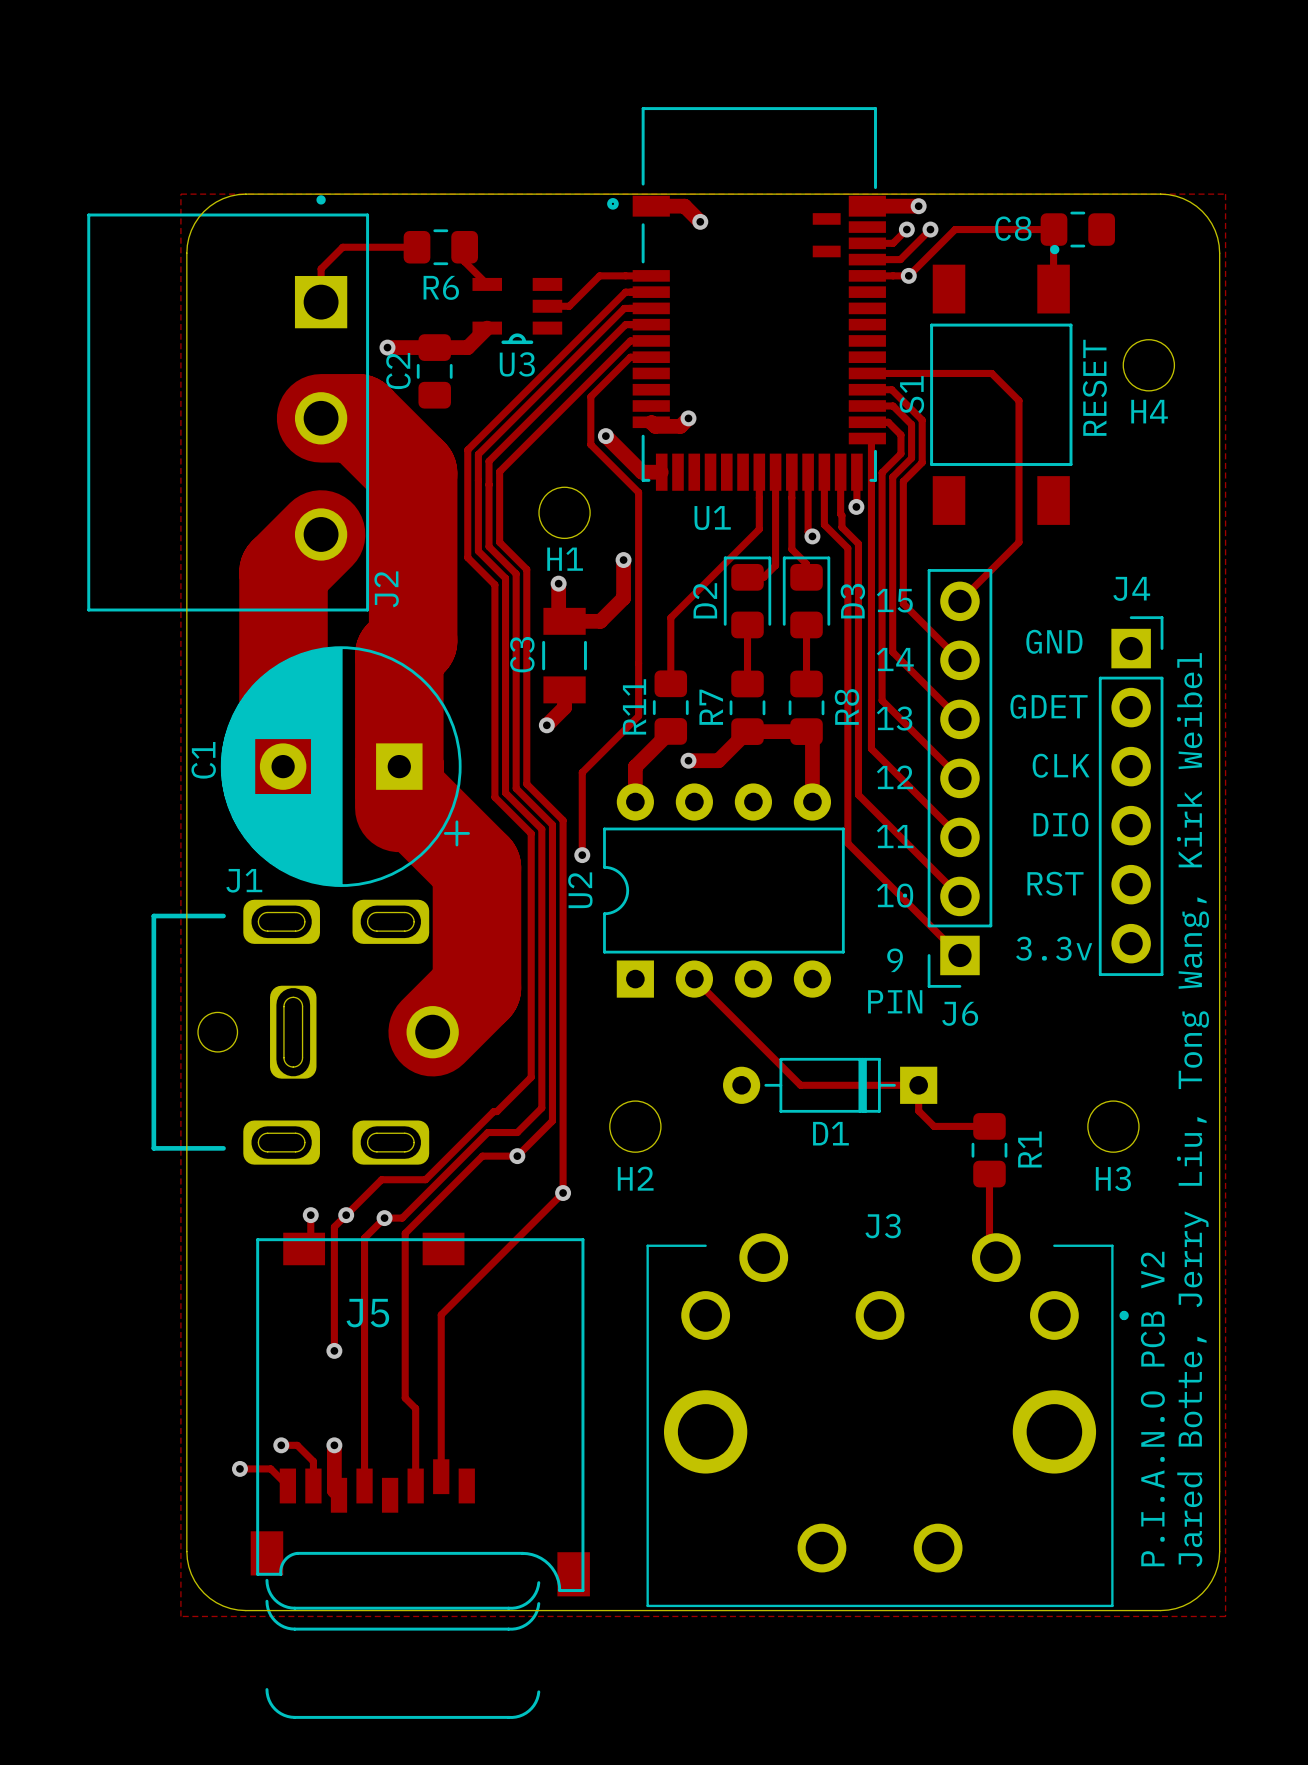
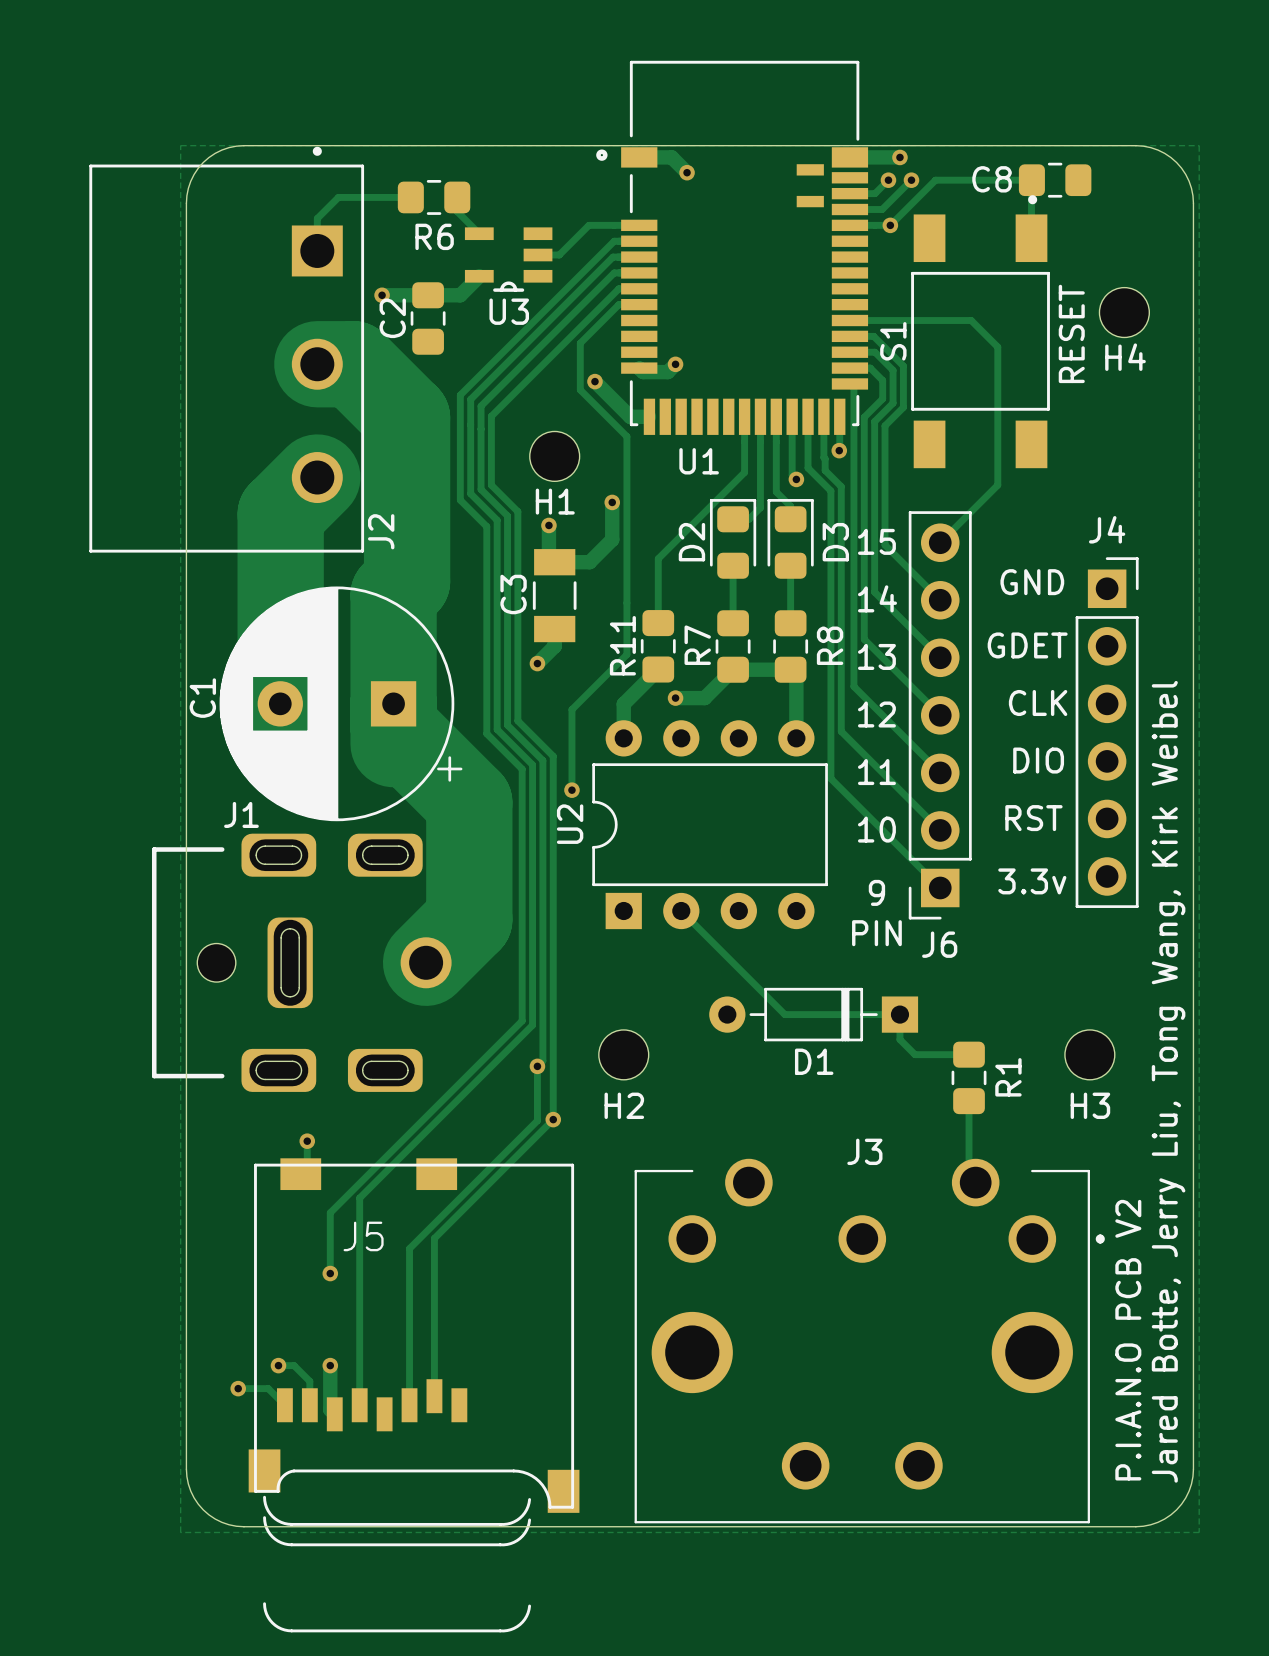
track: (531, 1077) (425, 1179) (381, 1179) (334, 1226) (334, 1288) -> (522, 1006) (522, 1020) (330, 1212)
track: (541, 1096) (541, 1108) (517, 1132) (487, 1132) (402, 1218) (384, 1218) -> (532, 1025) (359, 1198)
track: (552, 1121) (517, 1156) (482, 1156) (405, 1233) (405, 1398) (415, 1408) -> (542, 1049) (542, 1060) (537, 1066) (537, 1120) (409, 1248) (409, 1329)
via position: (517, 1156) -> (537, 1066)
via: (346, 1215) -> none
track: (387, 1215) (364, 1238) (364, 1273) -> none
via: (384, 1218) -> none

